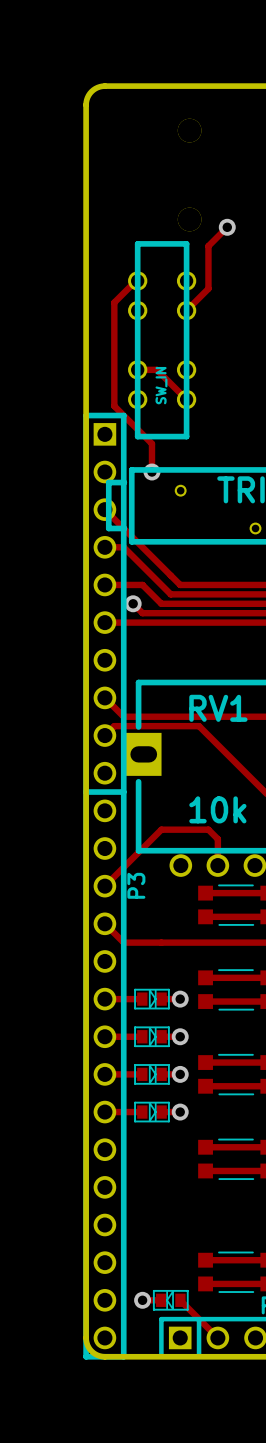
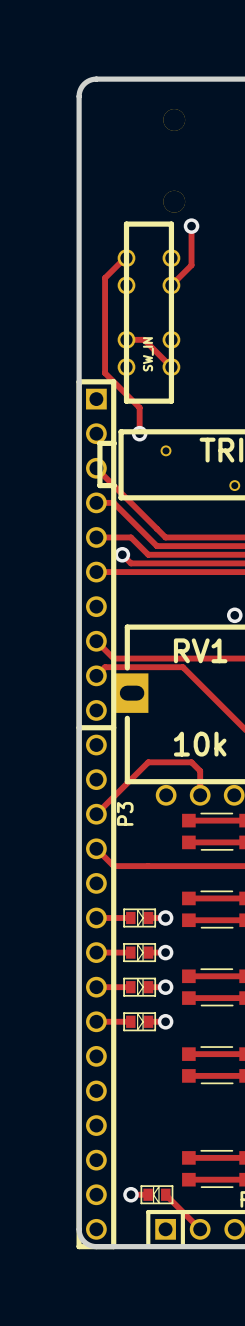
track: (227, 227) (208, 246) -> none
via position: (227, 227) -> (191, 226)
via: none -> (234, 615)

